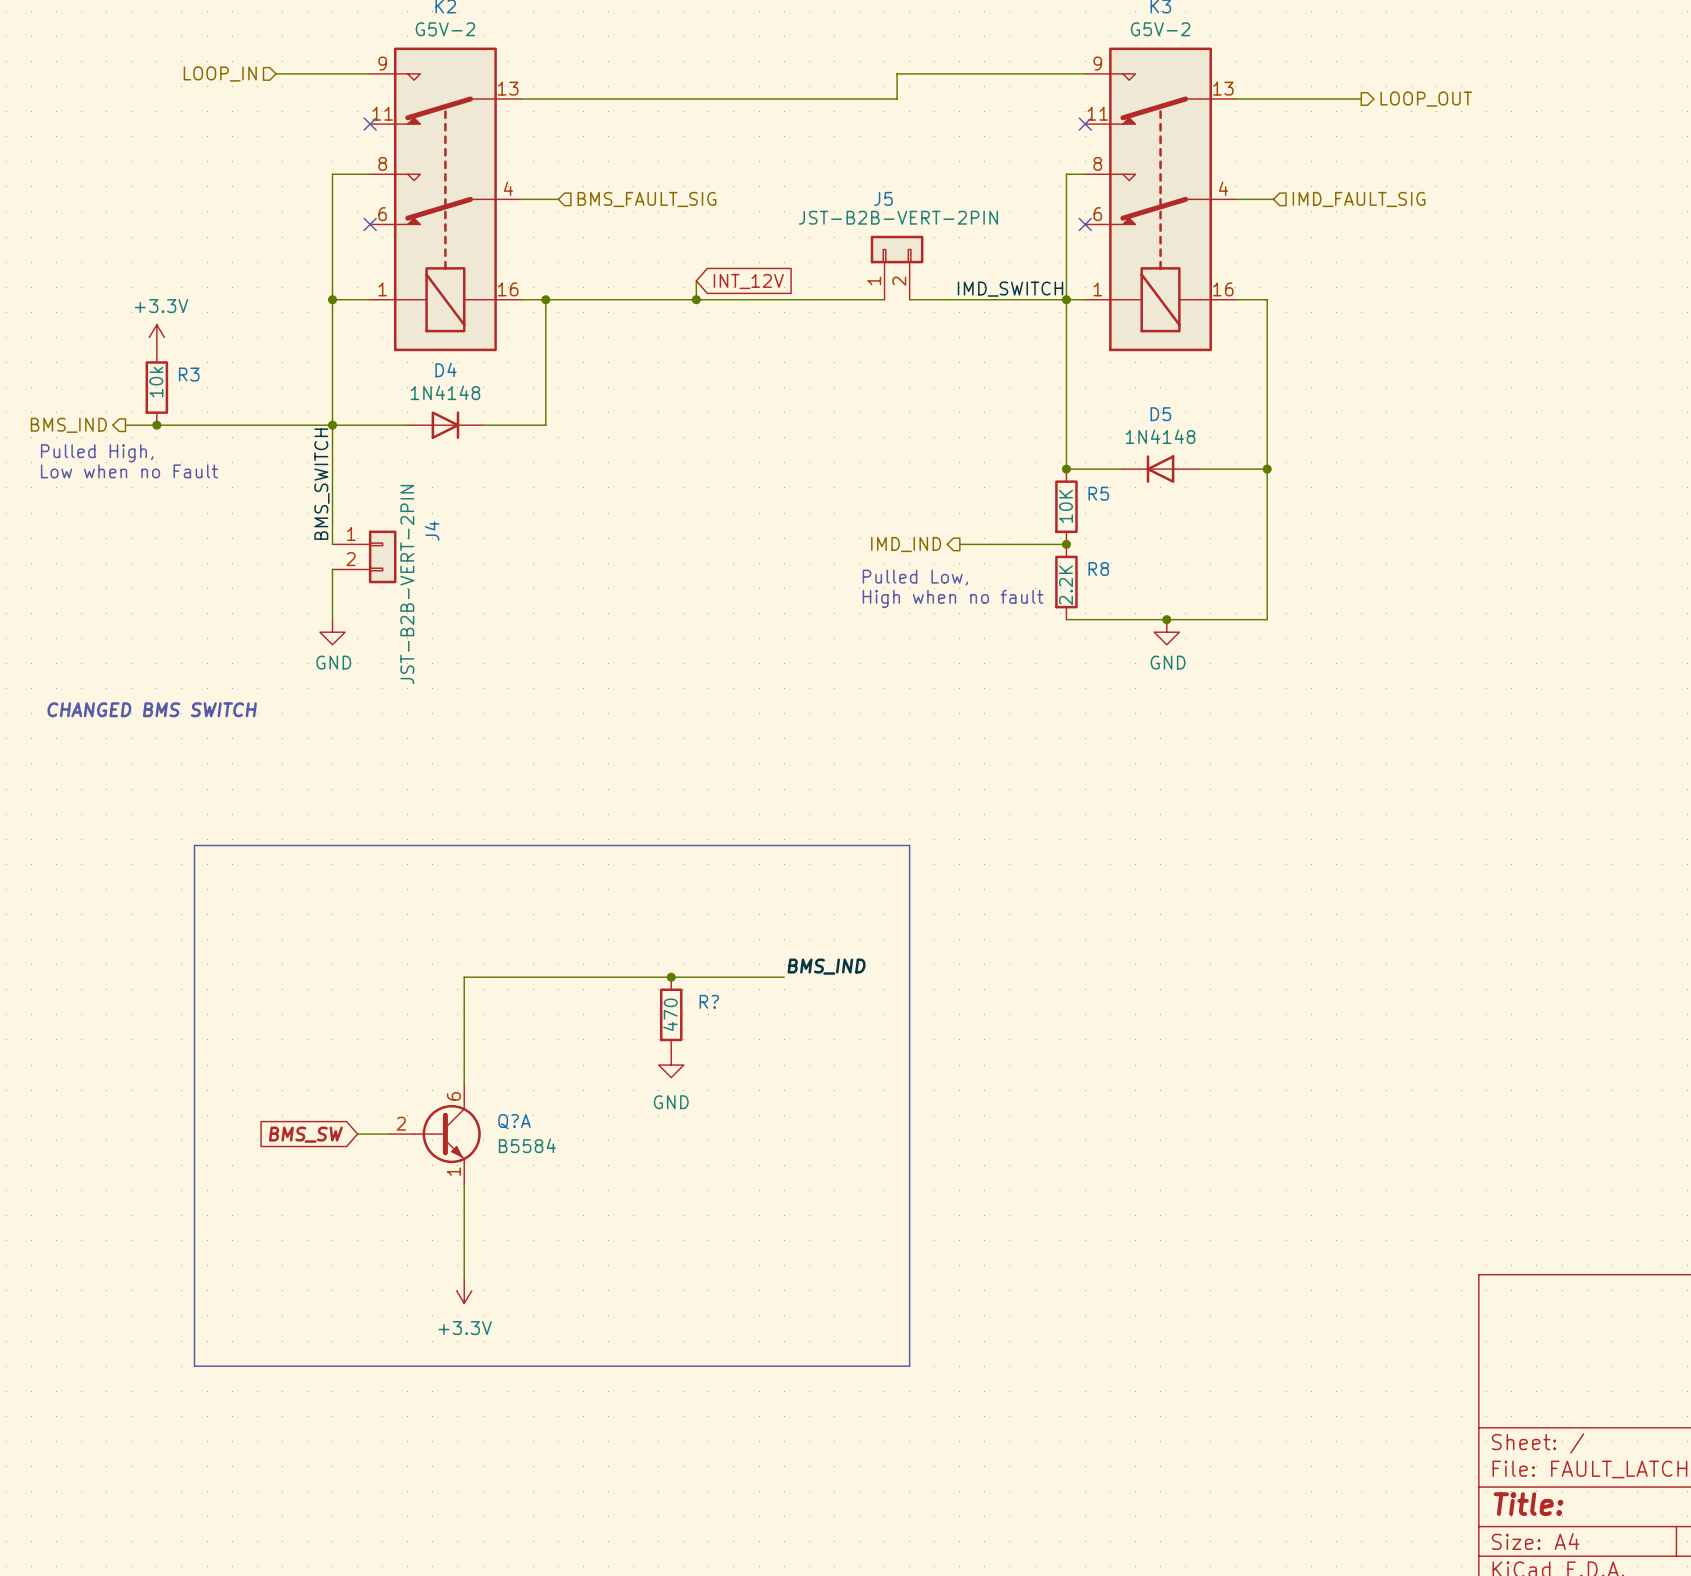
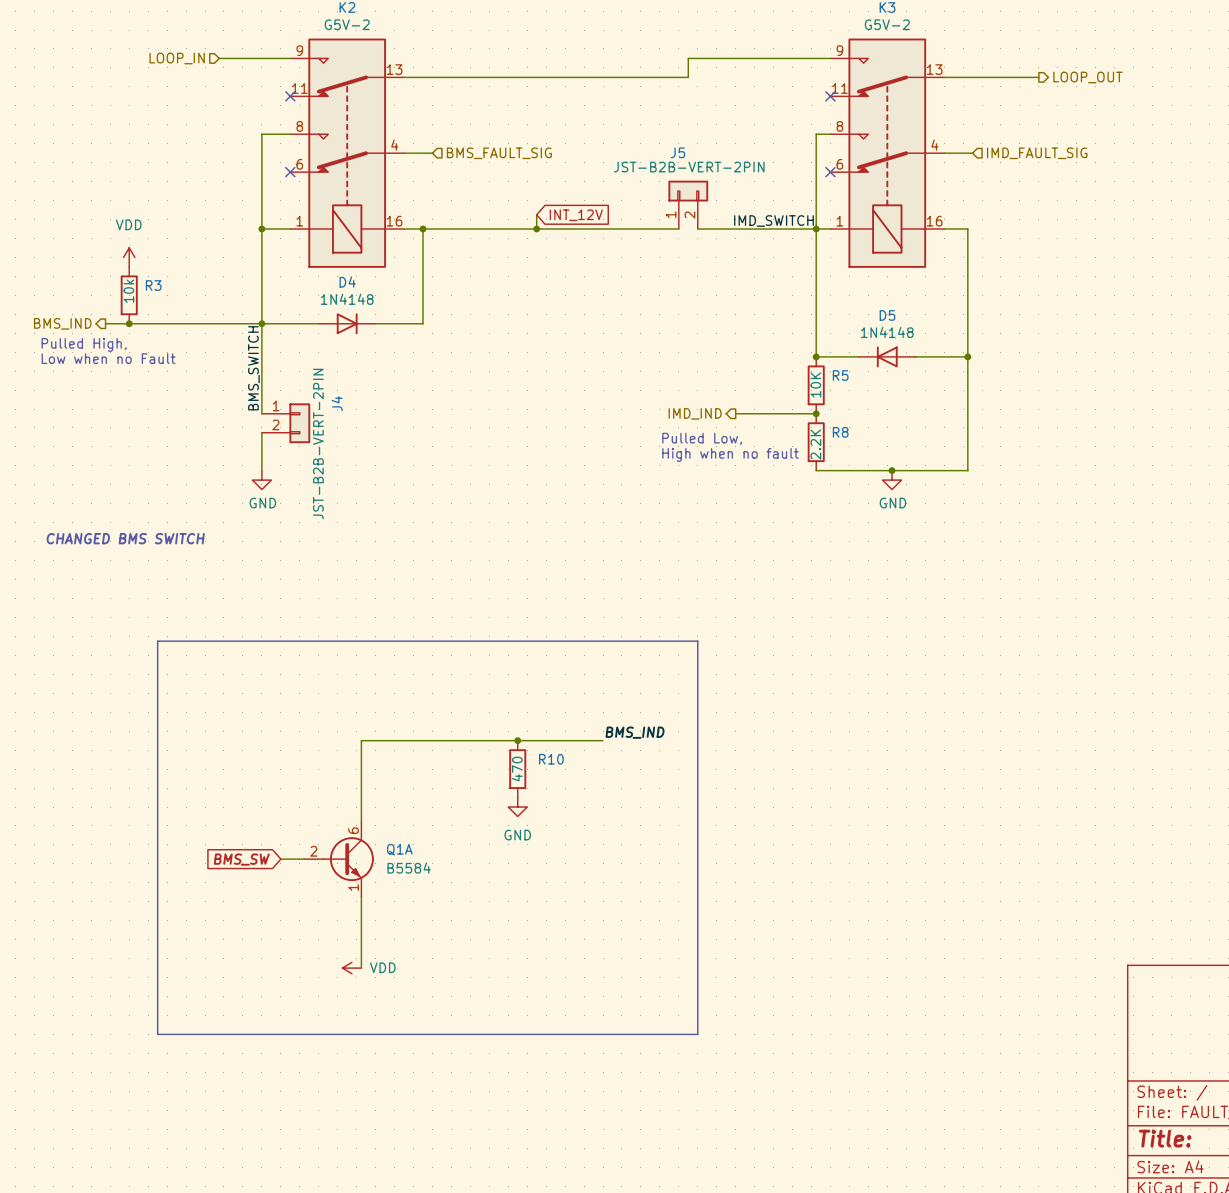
power symbol: +3.3V (156, 337) -> VDD (129, 257)
R? name: R? (709, 1001) -> R10 (551, 759)
Q?A name: Q?A (514, 1121) -> Q1A (399, 849)
power symbol: none -> VDD (351, 968)
power symbol: +3.3V (464, 1290) -> none

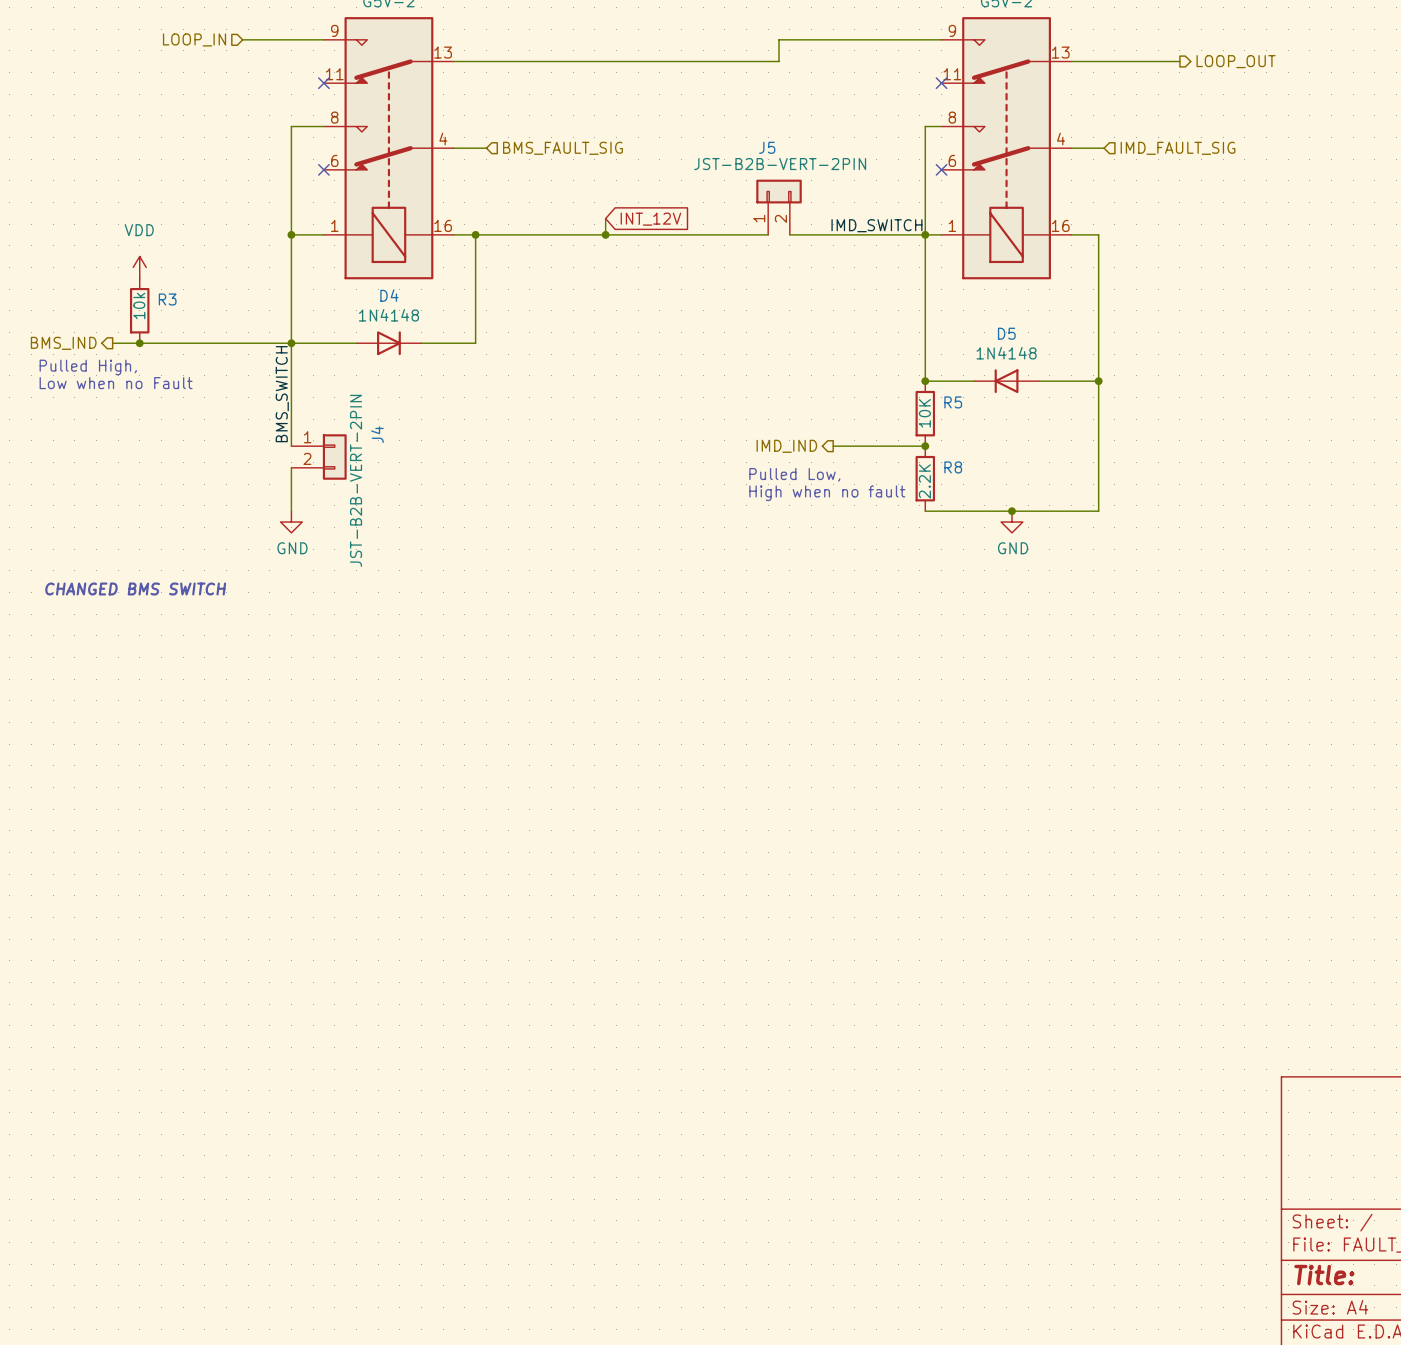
bus: (157, 641) (157, 1034) (697, 1034) (697, 641) (157, 641) -> none
label: BMS_IND (635, 732) -> none
junction: (517, 740) -> none
wire: (603, 740) (361, 740) (361, 821) -> none
R10: 470 (517, 769) -> none
power symbol: GND (517, 807) -> none
global label: BMS_SW (241, 859) -> none
wire: (280, 859) (304, 859) -> none
Q1A: B5584 (339, 859) -> none
wire: (361, 897) (361, 968) -> none
power symbol: VDD (351, 968) -> none

